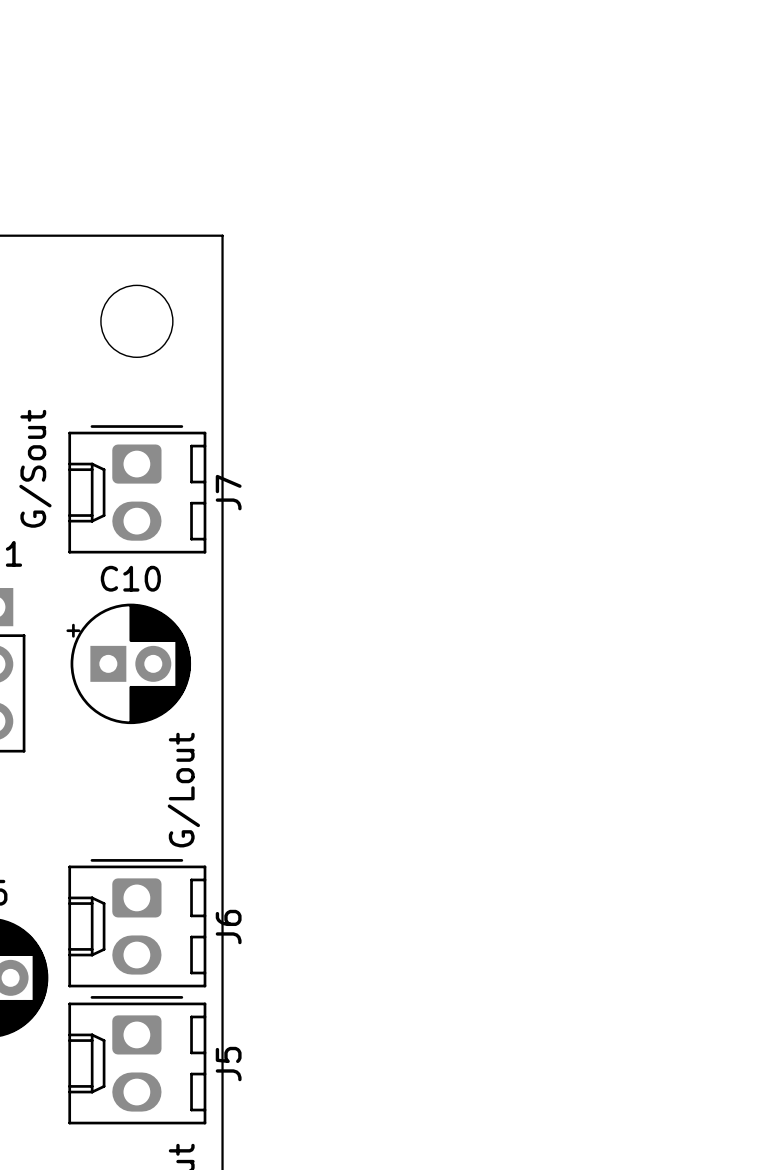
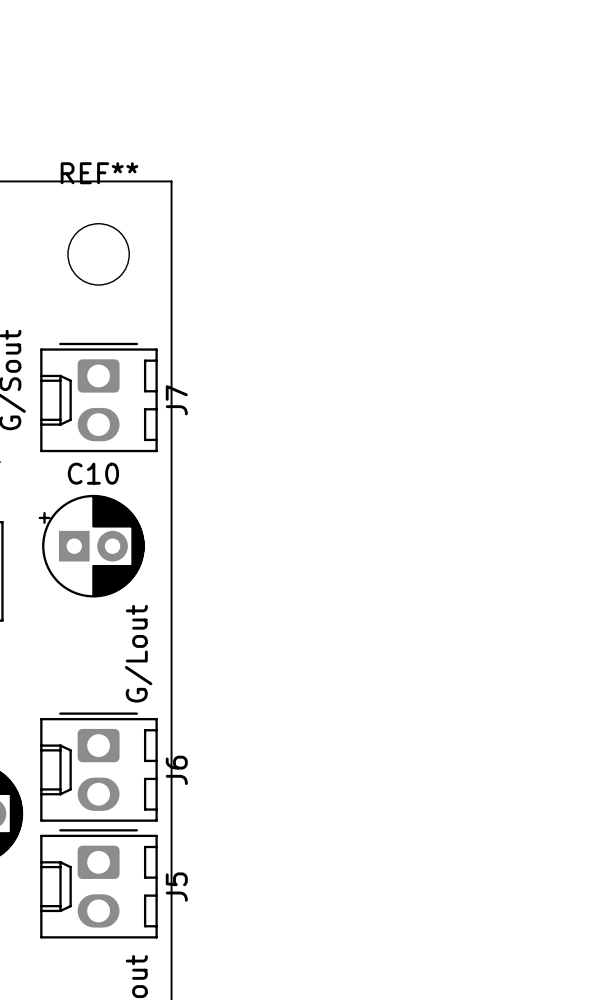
REF** name: none -> REF** (99, 173)

